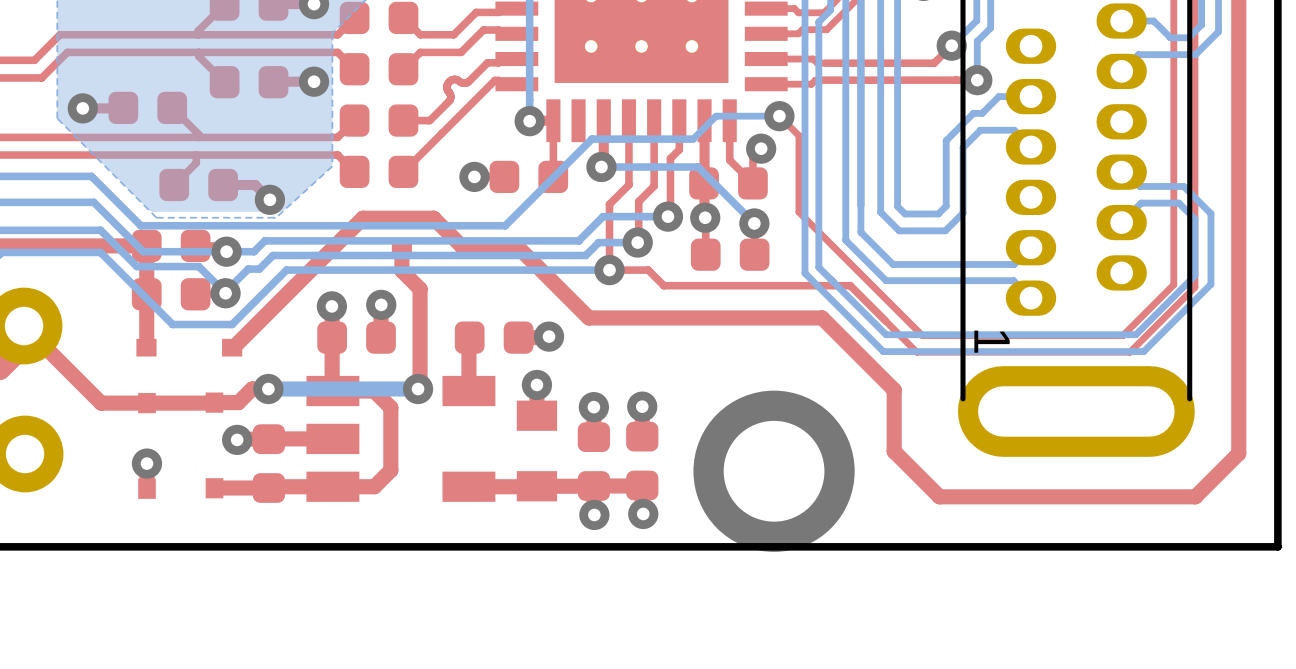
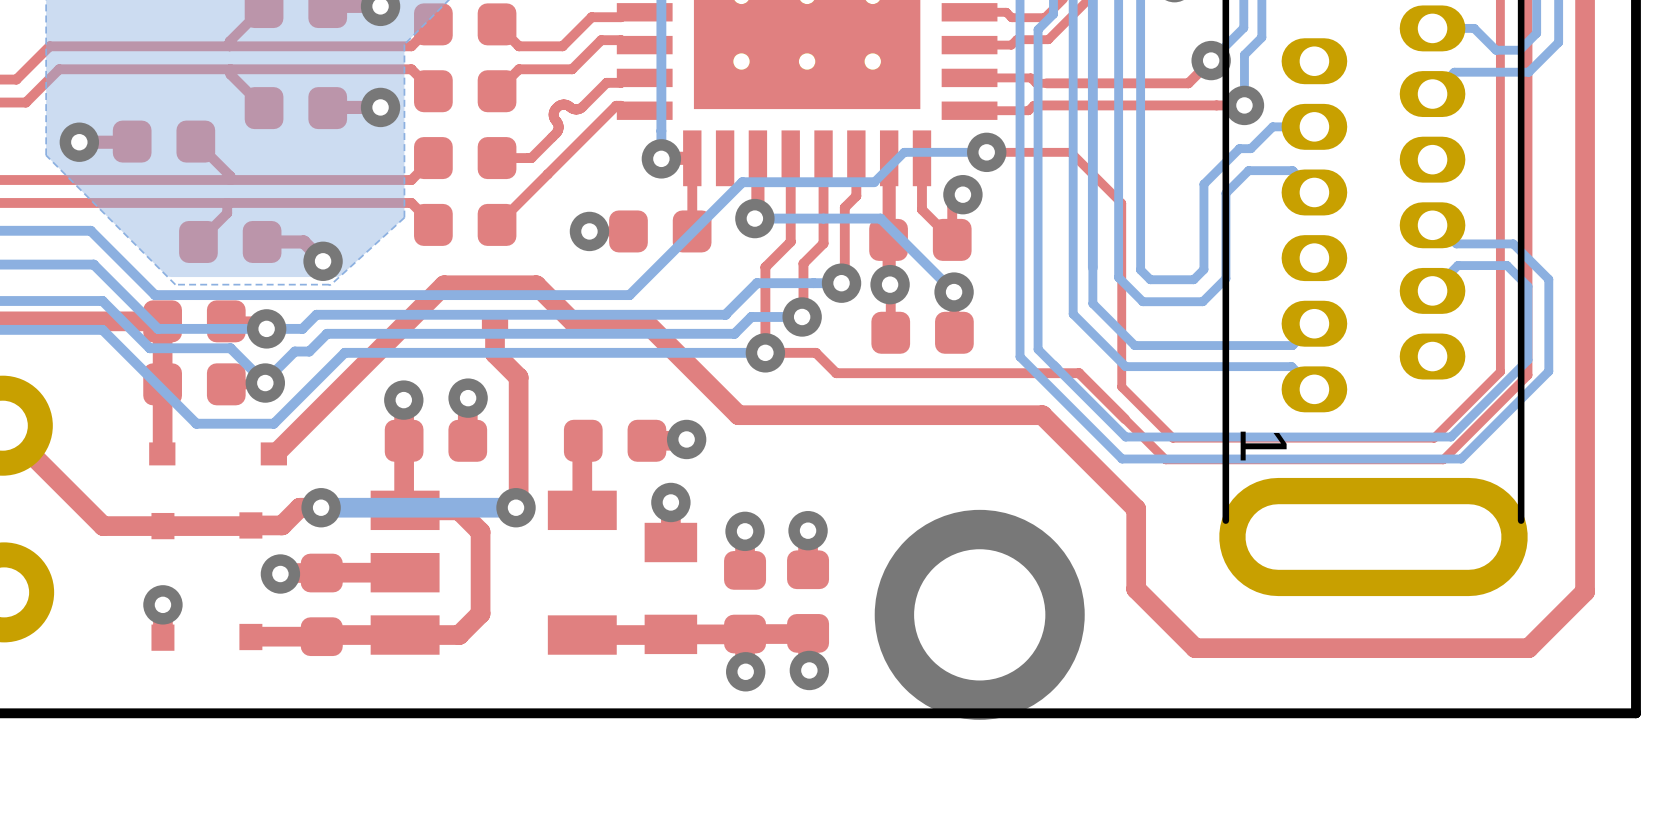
top track: (779, 116) (798, 135) (798, 212) (883, 296) -> (986, 152) (1070, 152) (1121, 203) (1121, 386)

